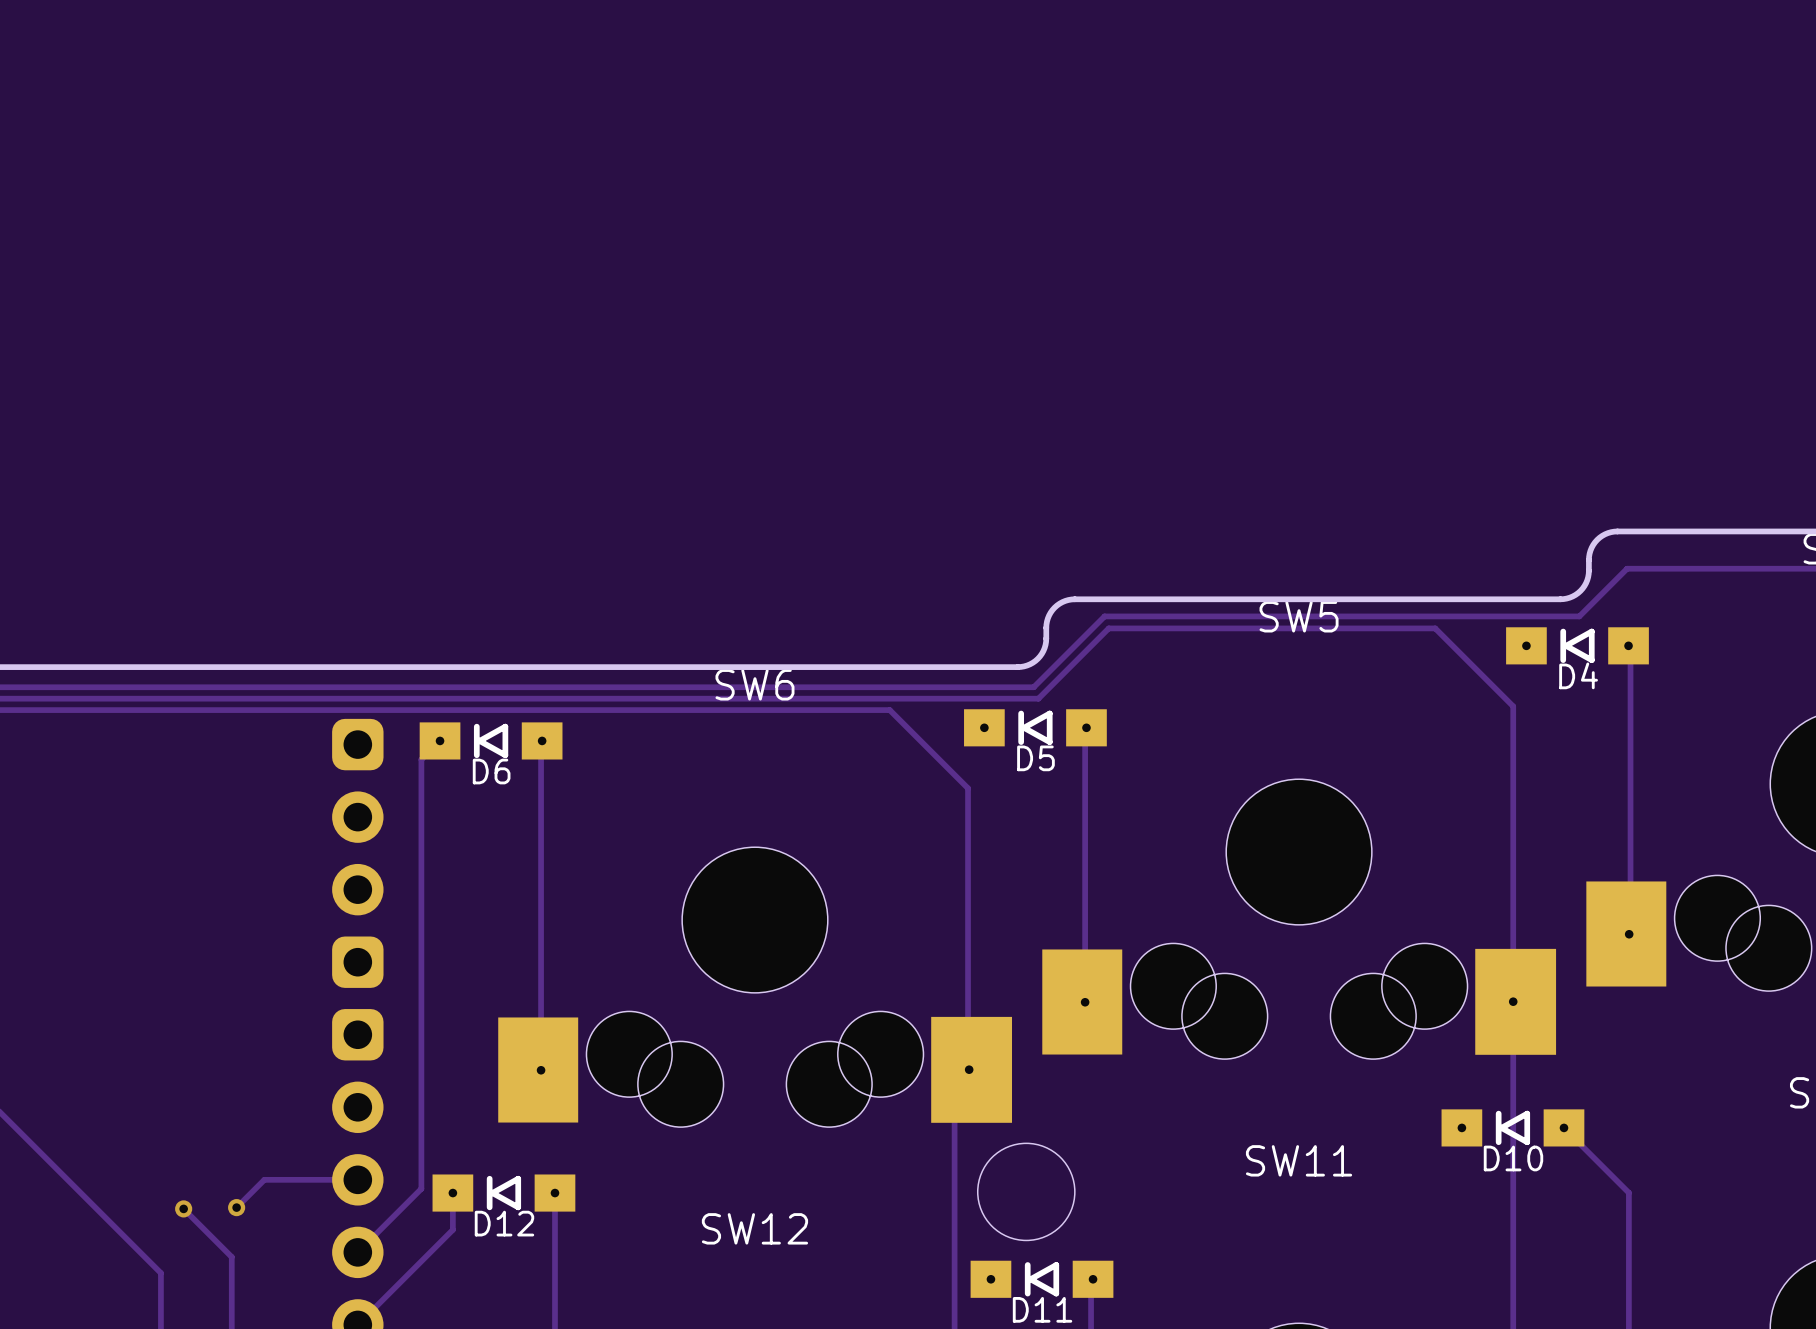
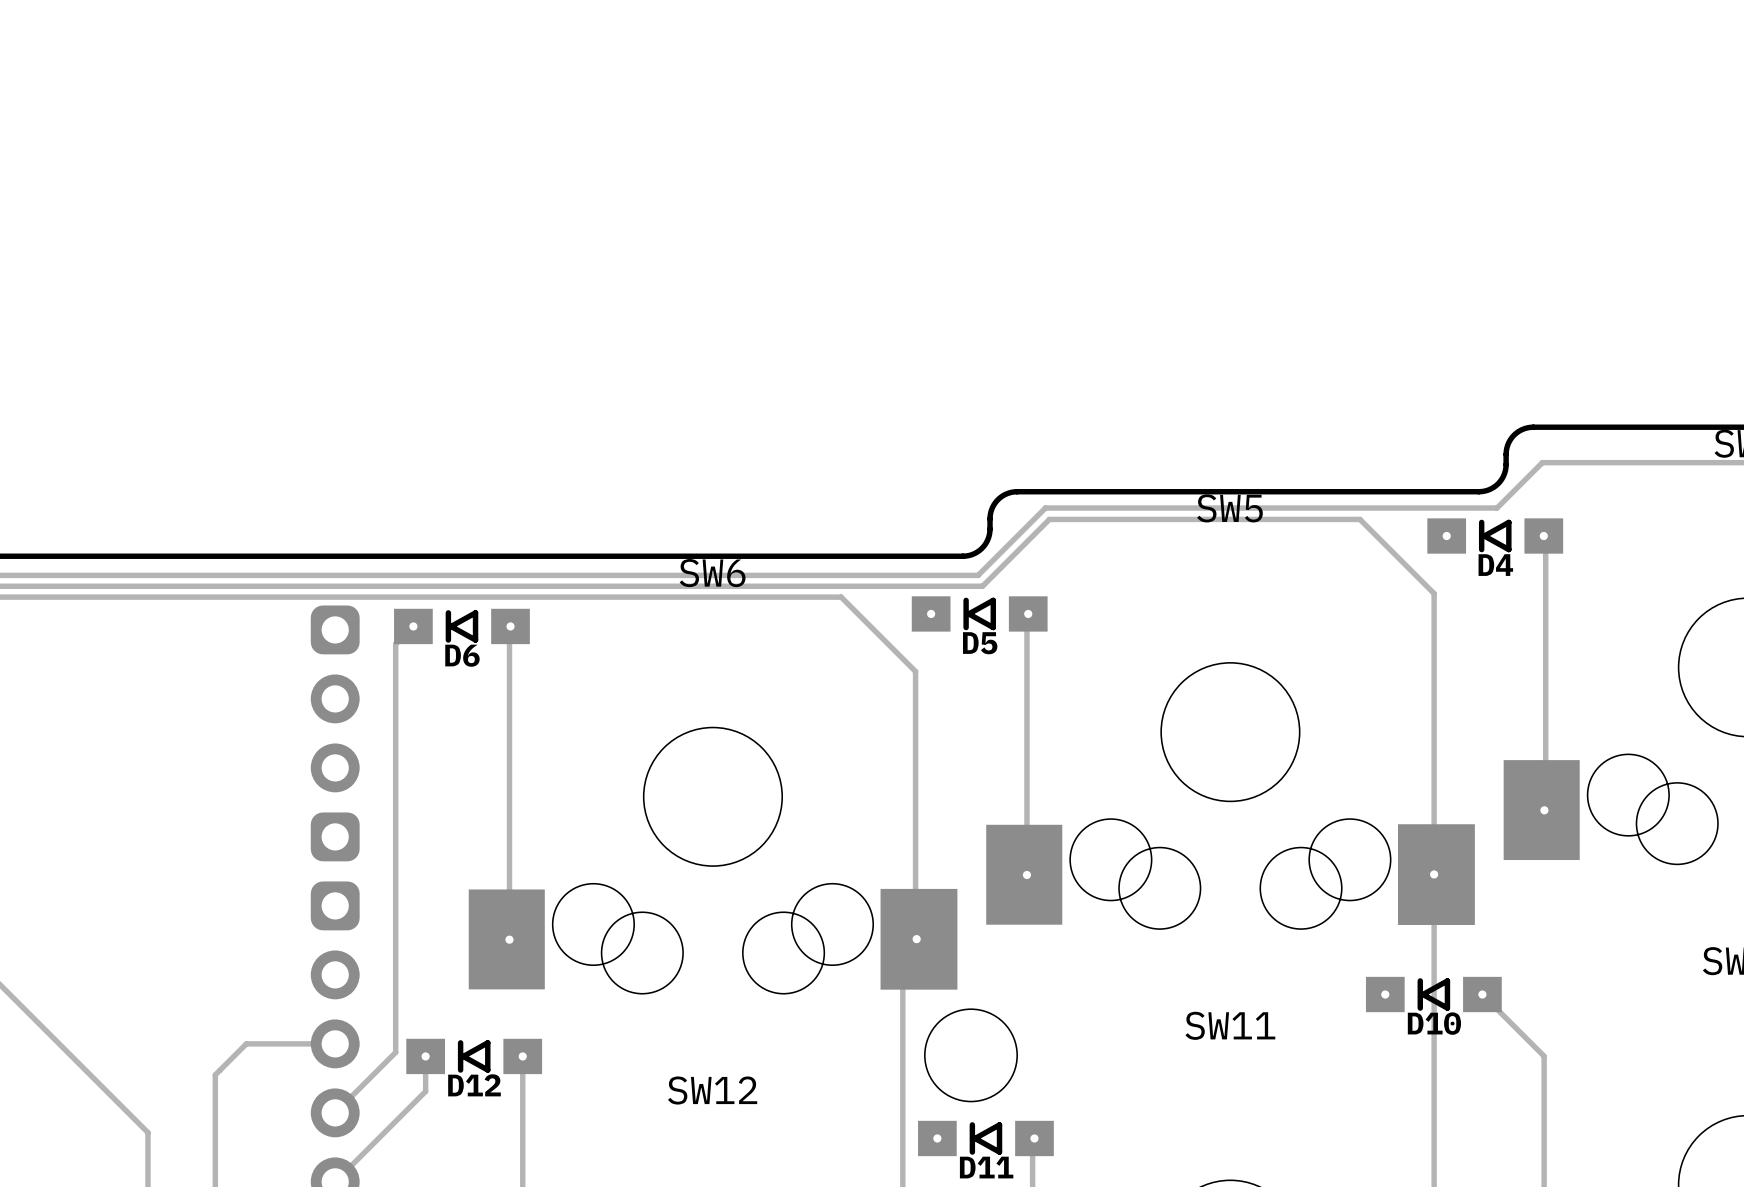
via: (236, 1207) -> none
track: (183, 1208) (231, 1257) -> (219, 1071) (215, 1074) (215, 1117)
via: (183, 1208) -> none

